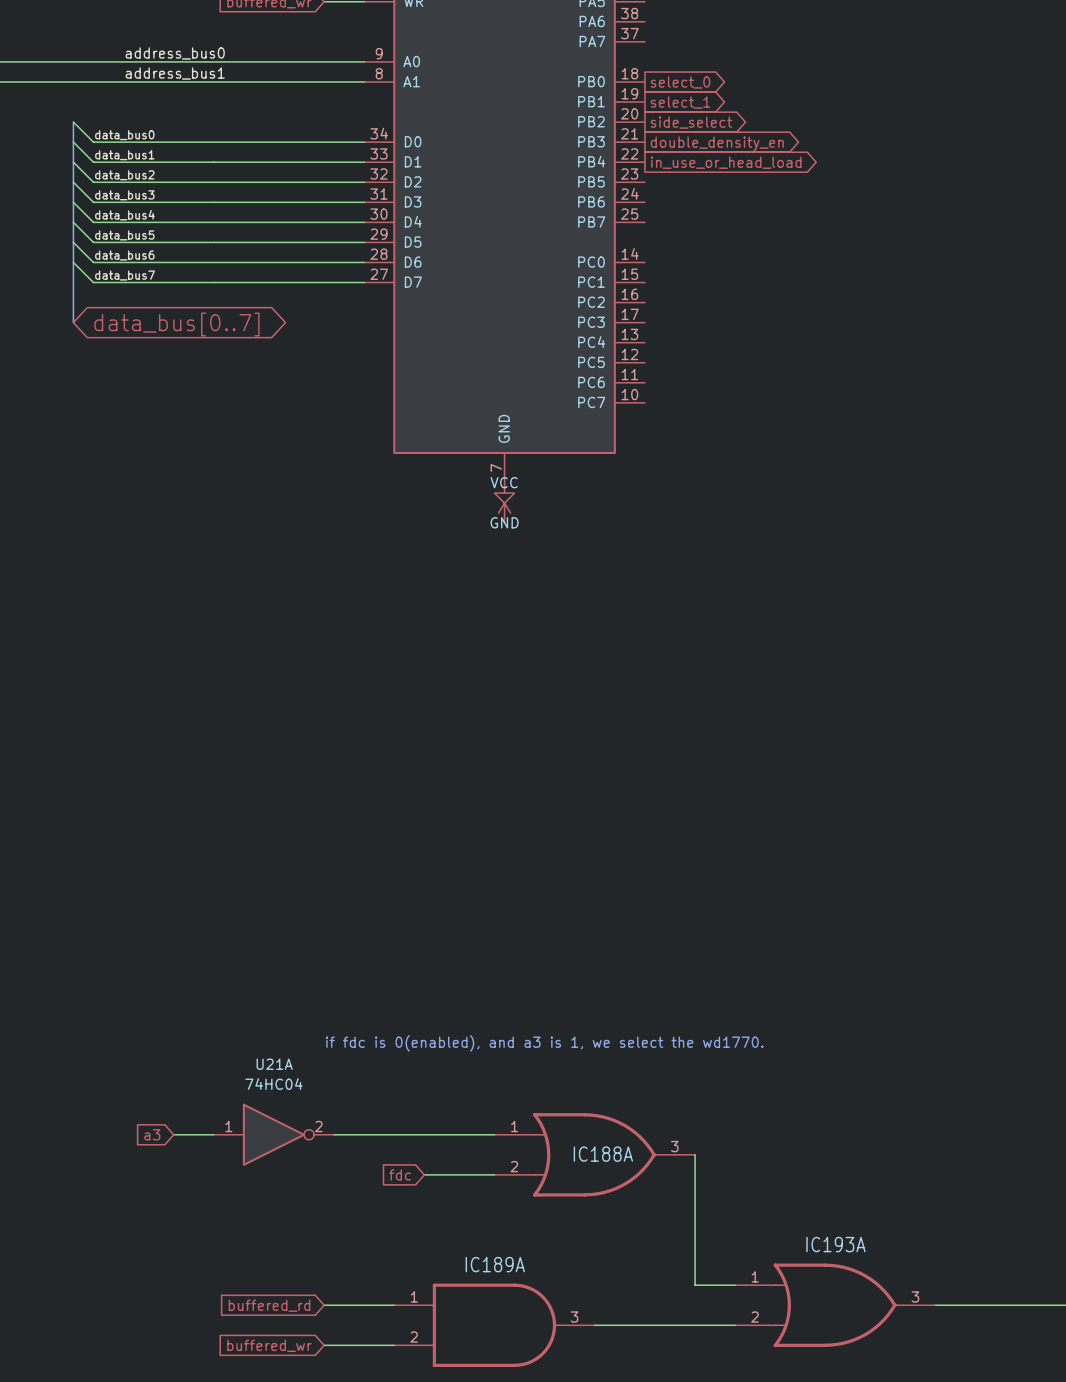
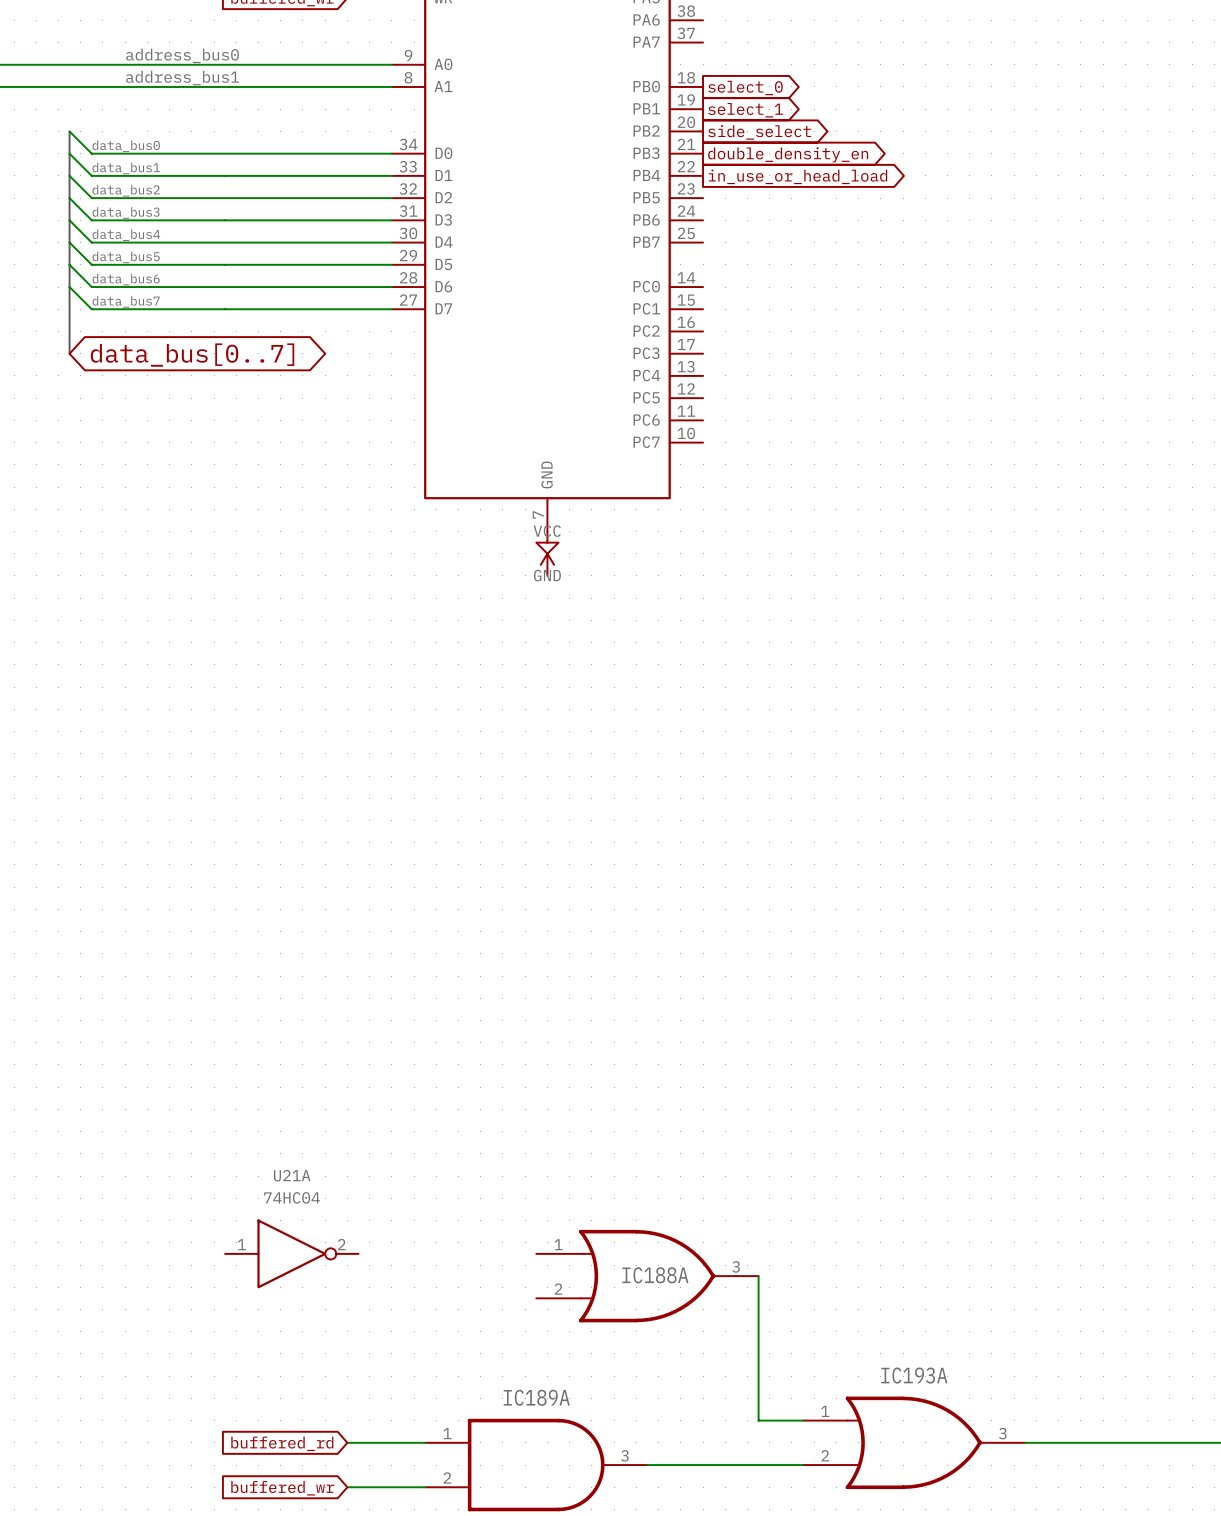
text: if fdc is 0(enabled), and a3 is 1, we select the wd1770. (544, 1043) -> none
global label: a3 (152, 1134) -> none
wire: (173, 1134) (213, 1134) -> none
wire: (334, 1134) (494, 1134) -> none
global label: fdc (400, 1174) -> none
wire: (424, 1174) (494, 1174) -> none

